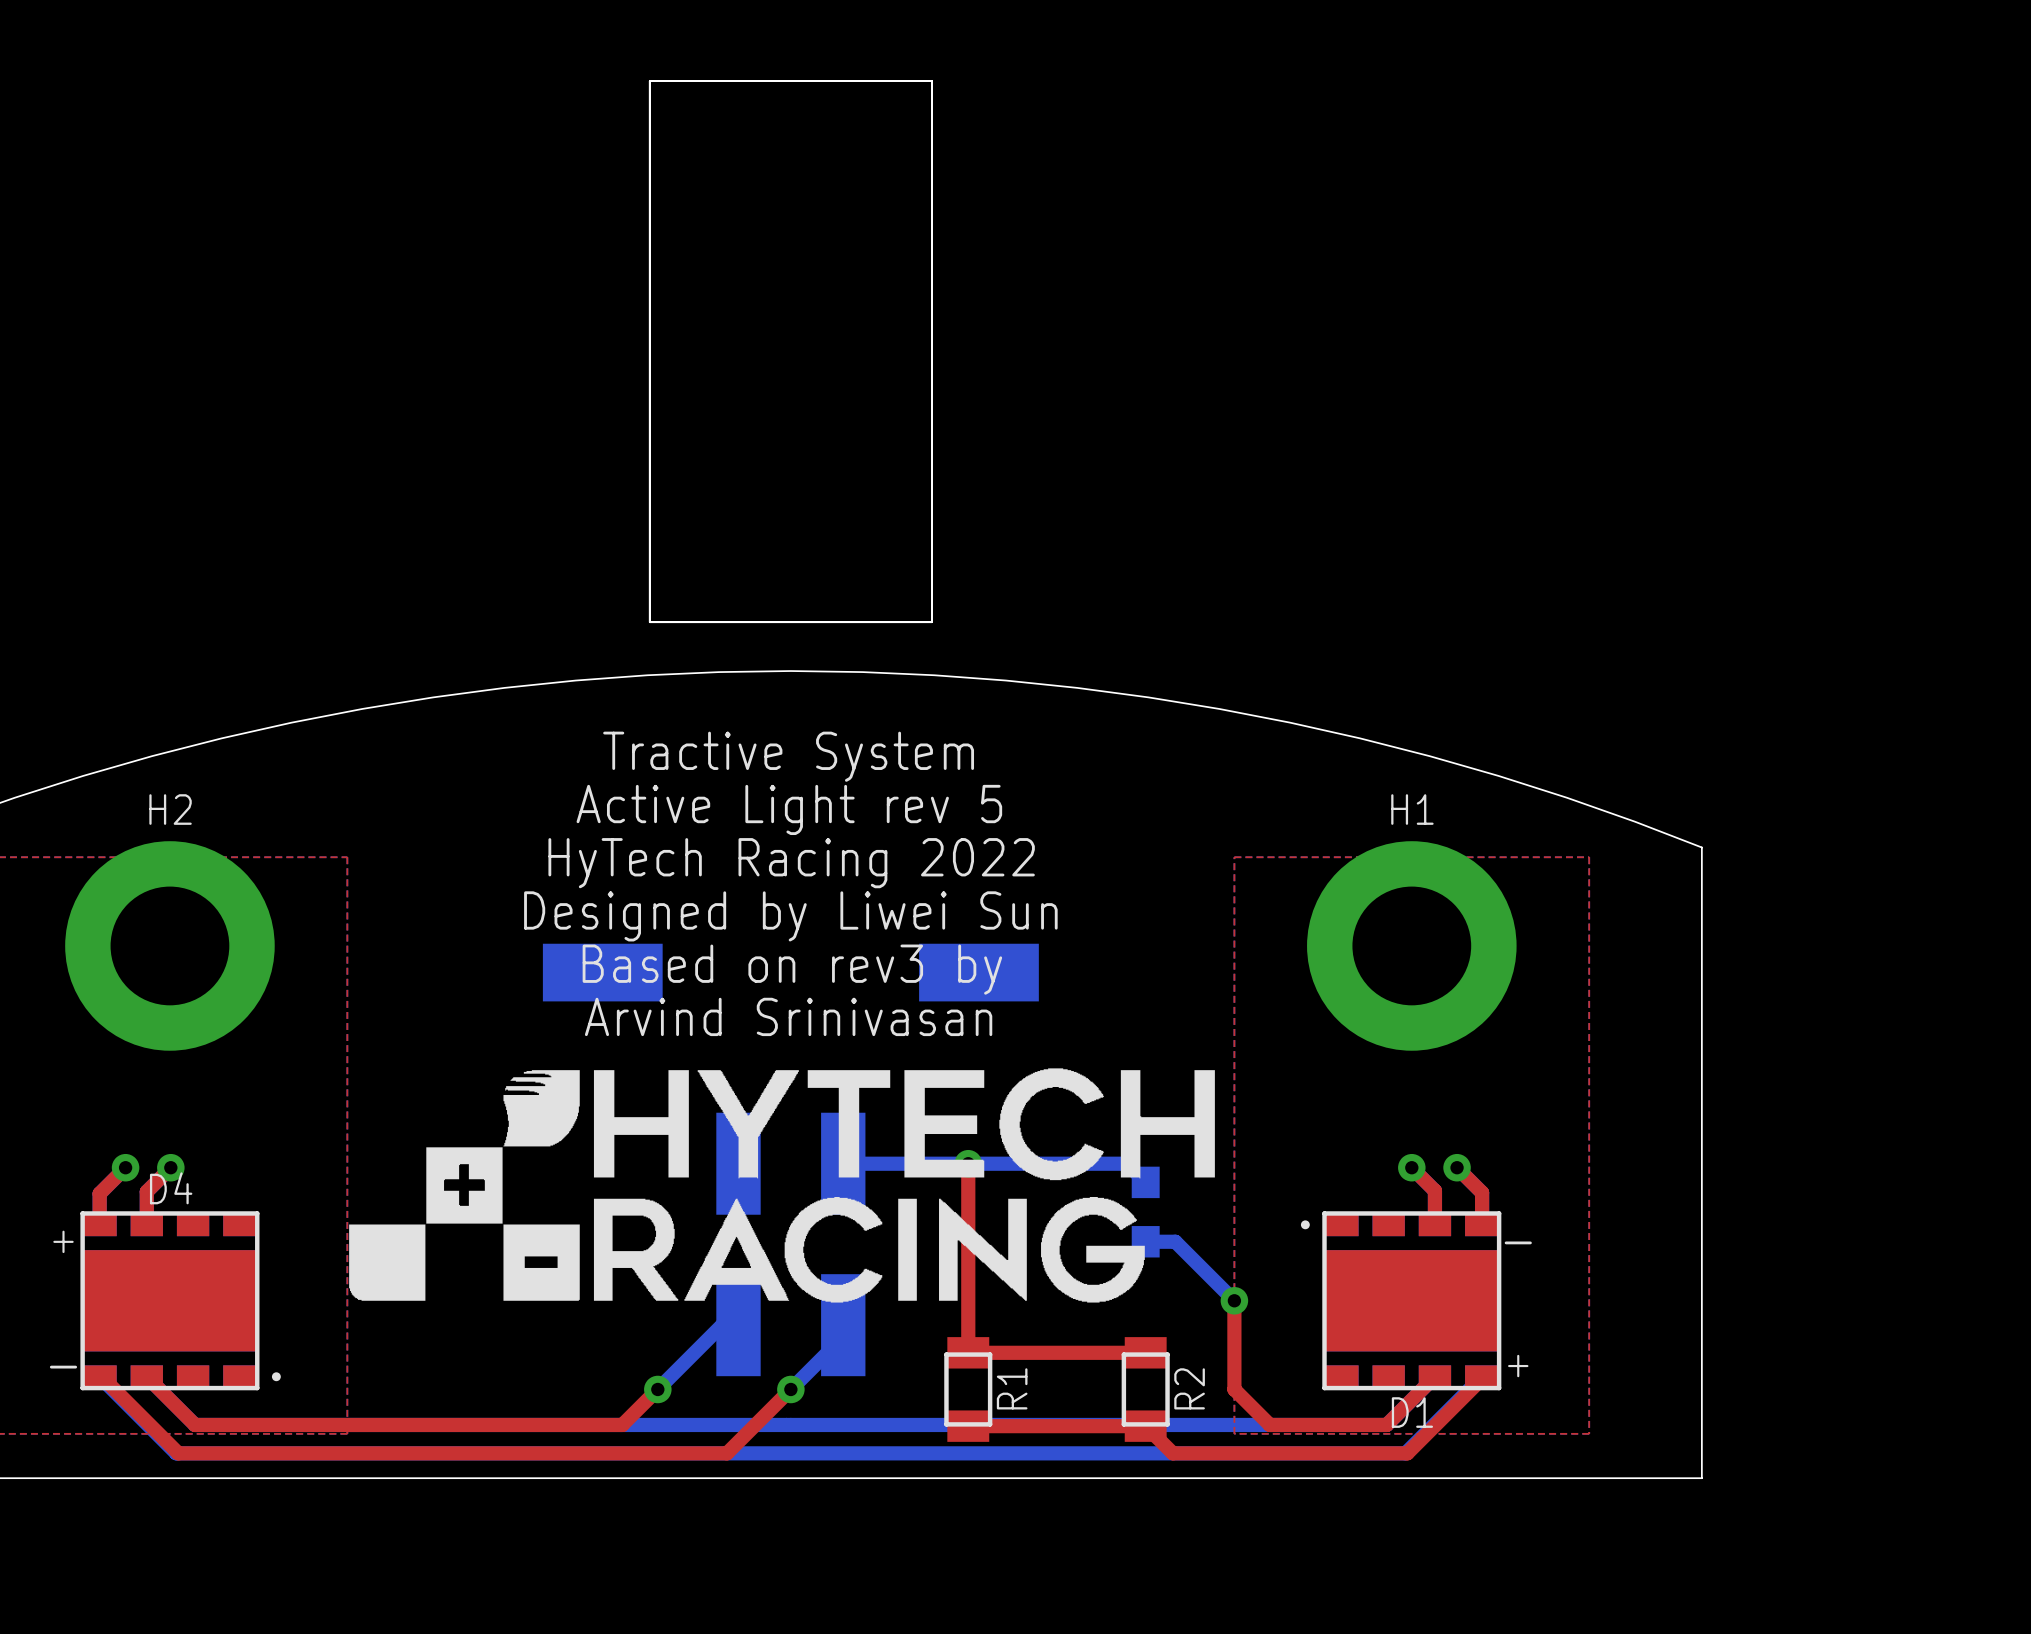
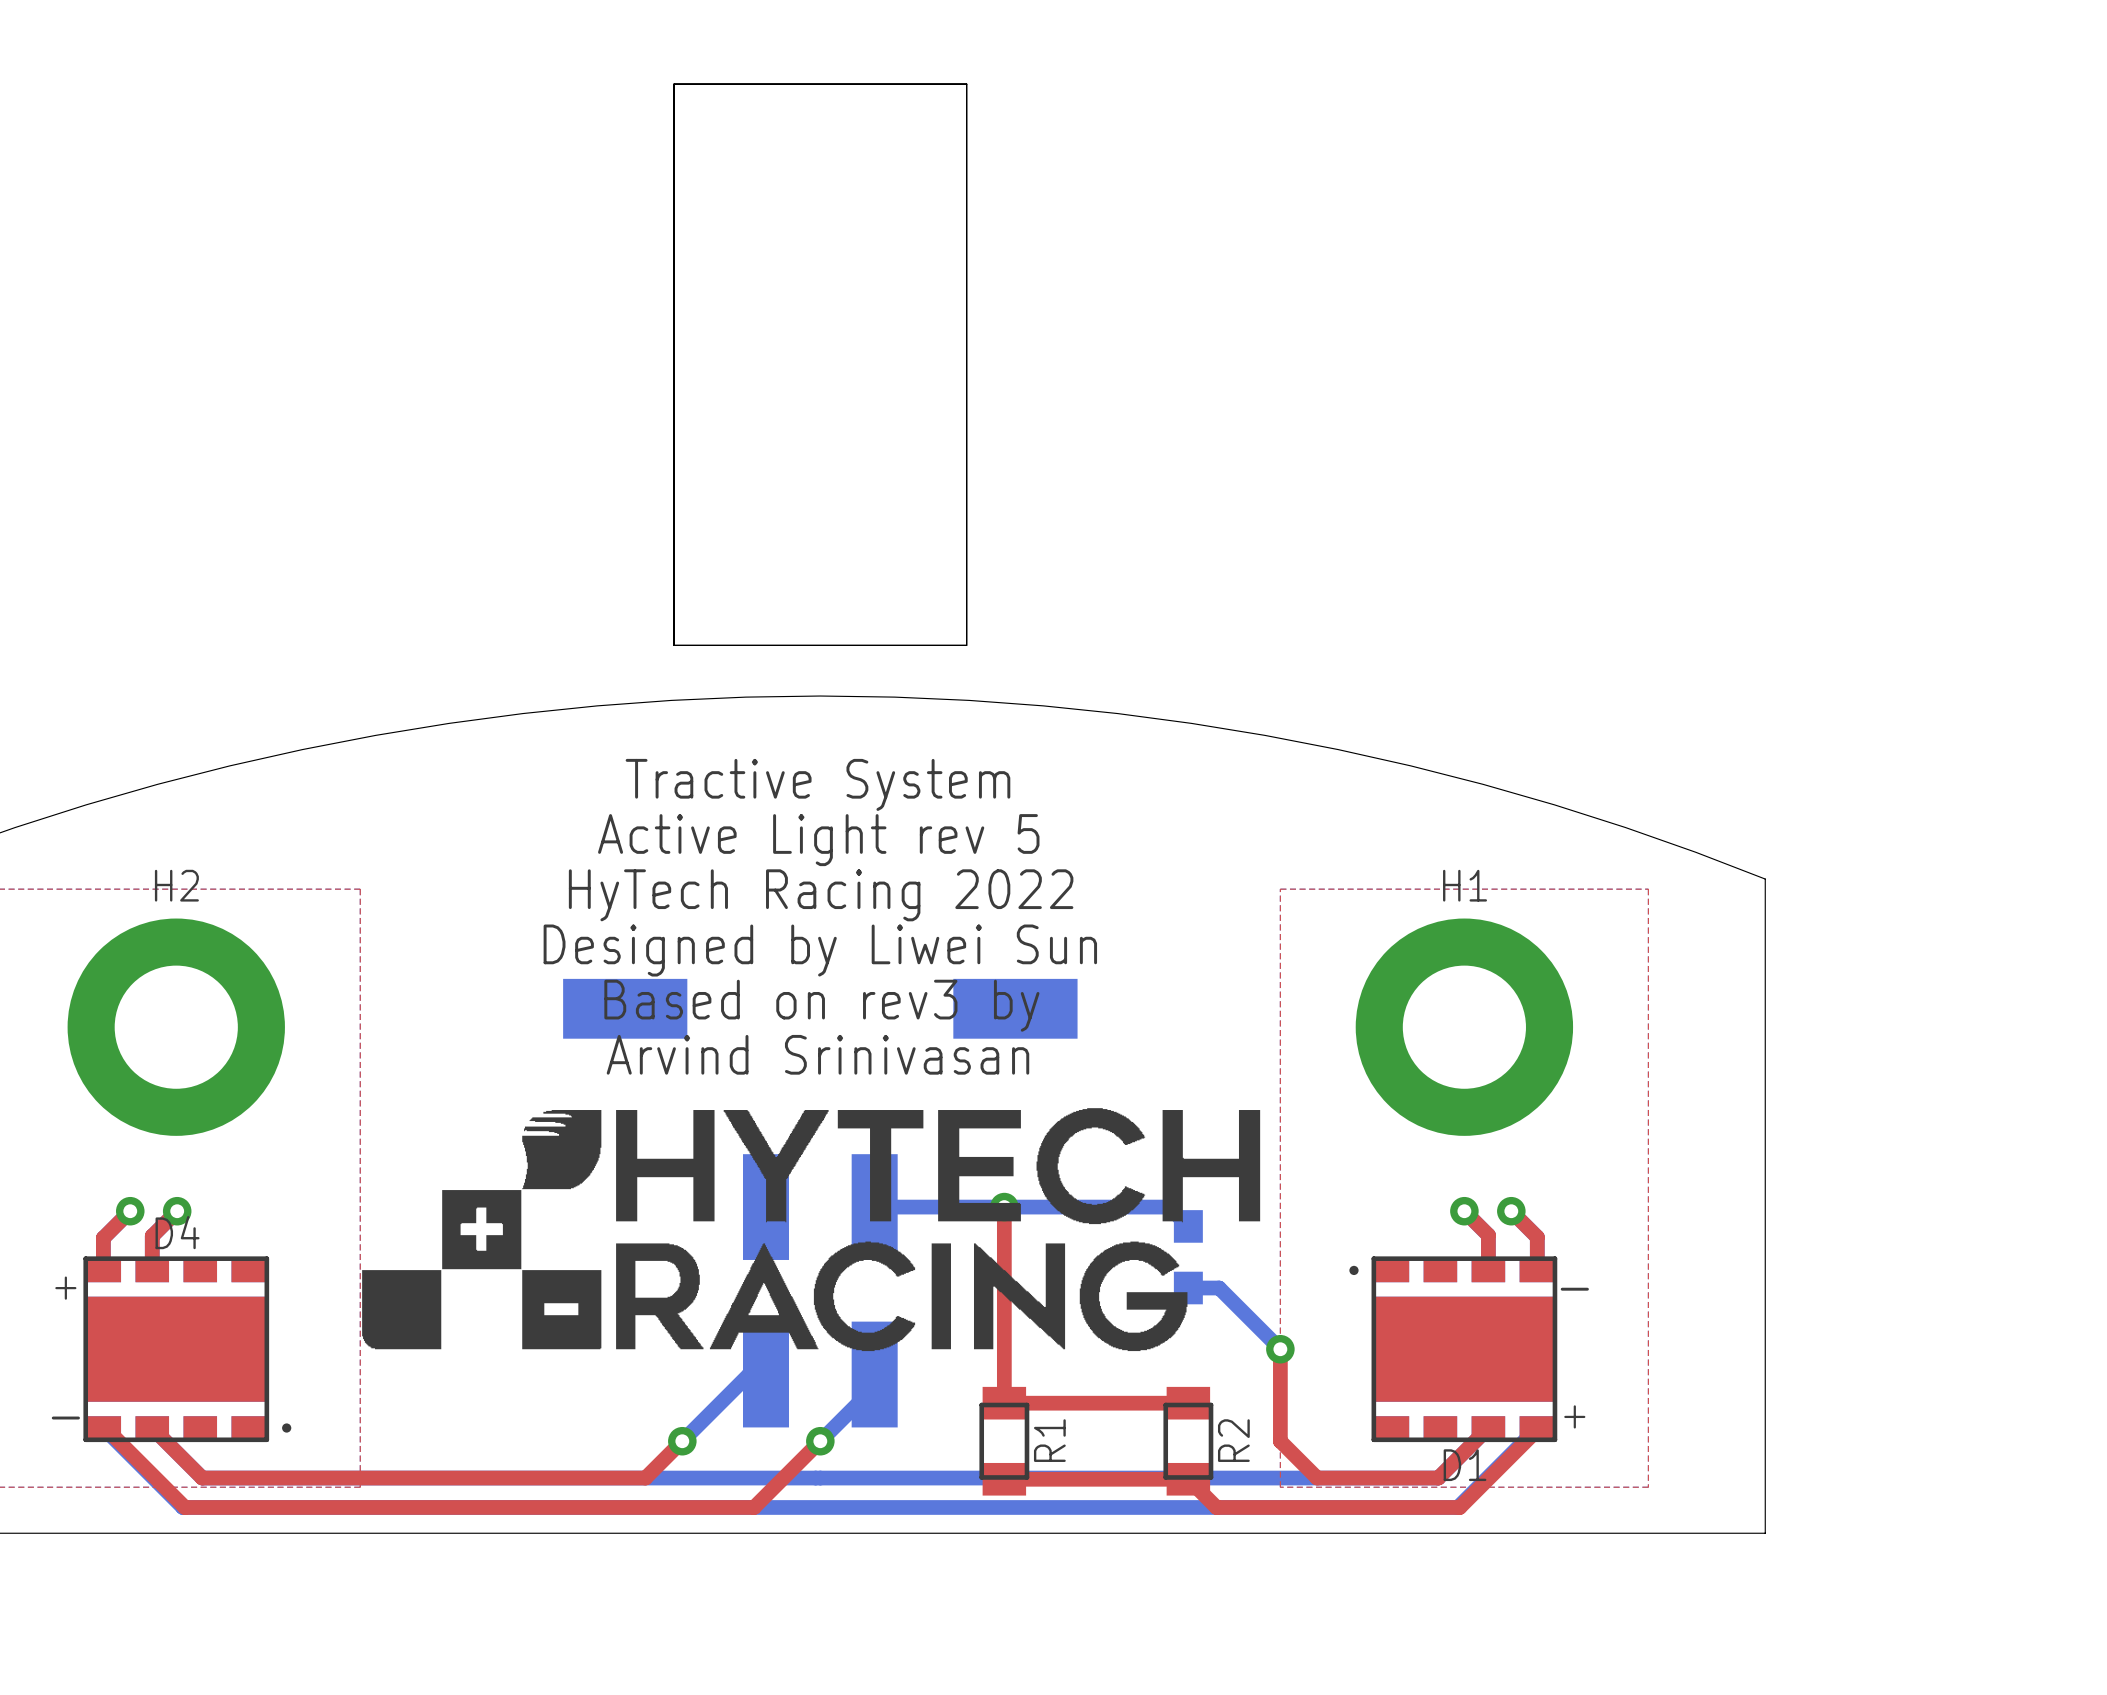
H2 position: (169, 945) -> (176, 1027)
H1 position: (1411, 945) -> (1464, 1027)

